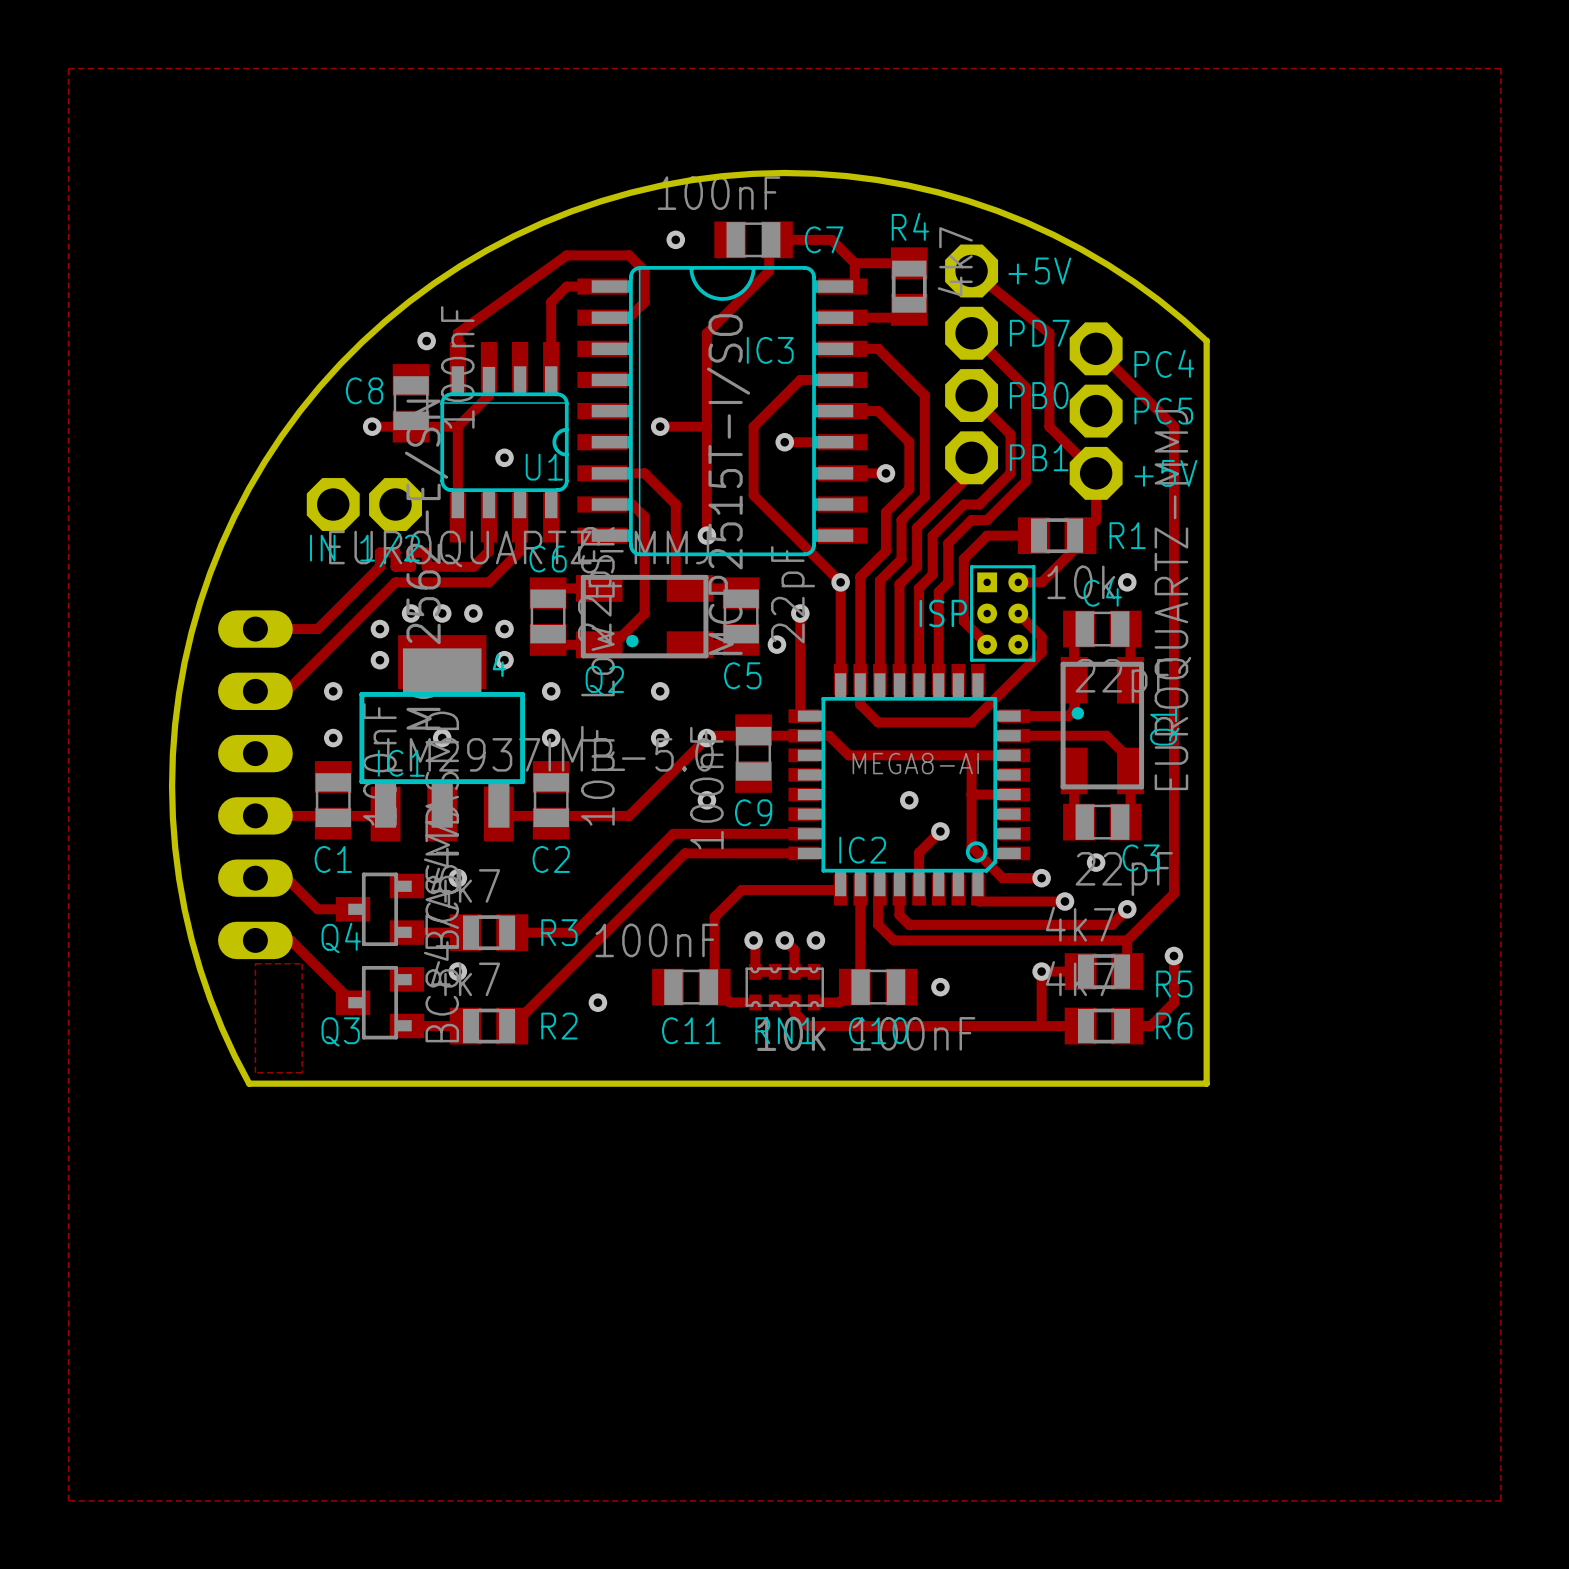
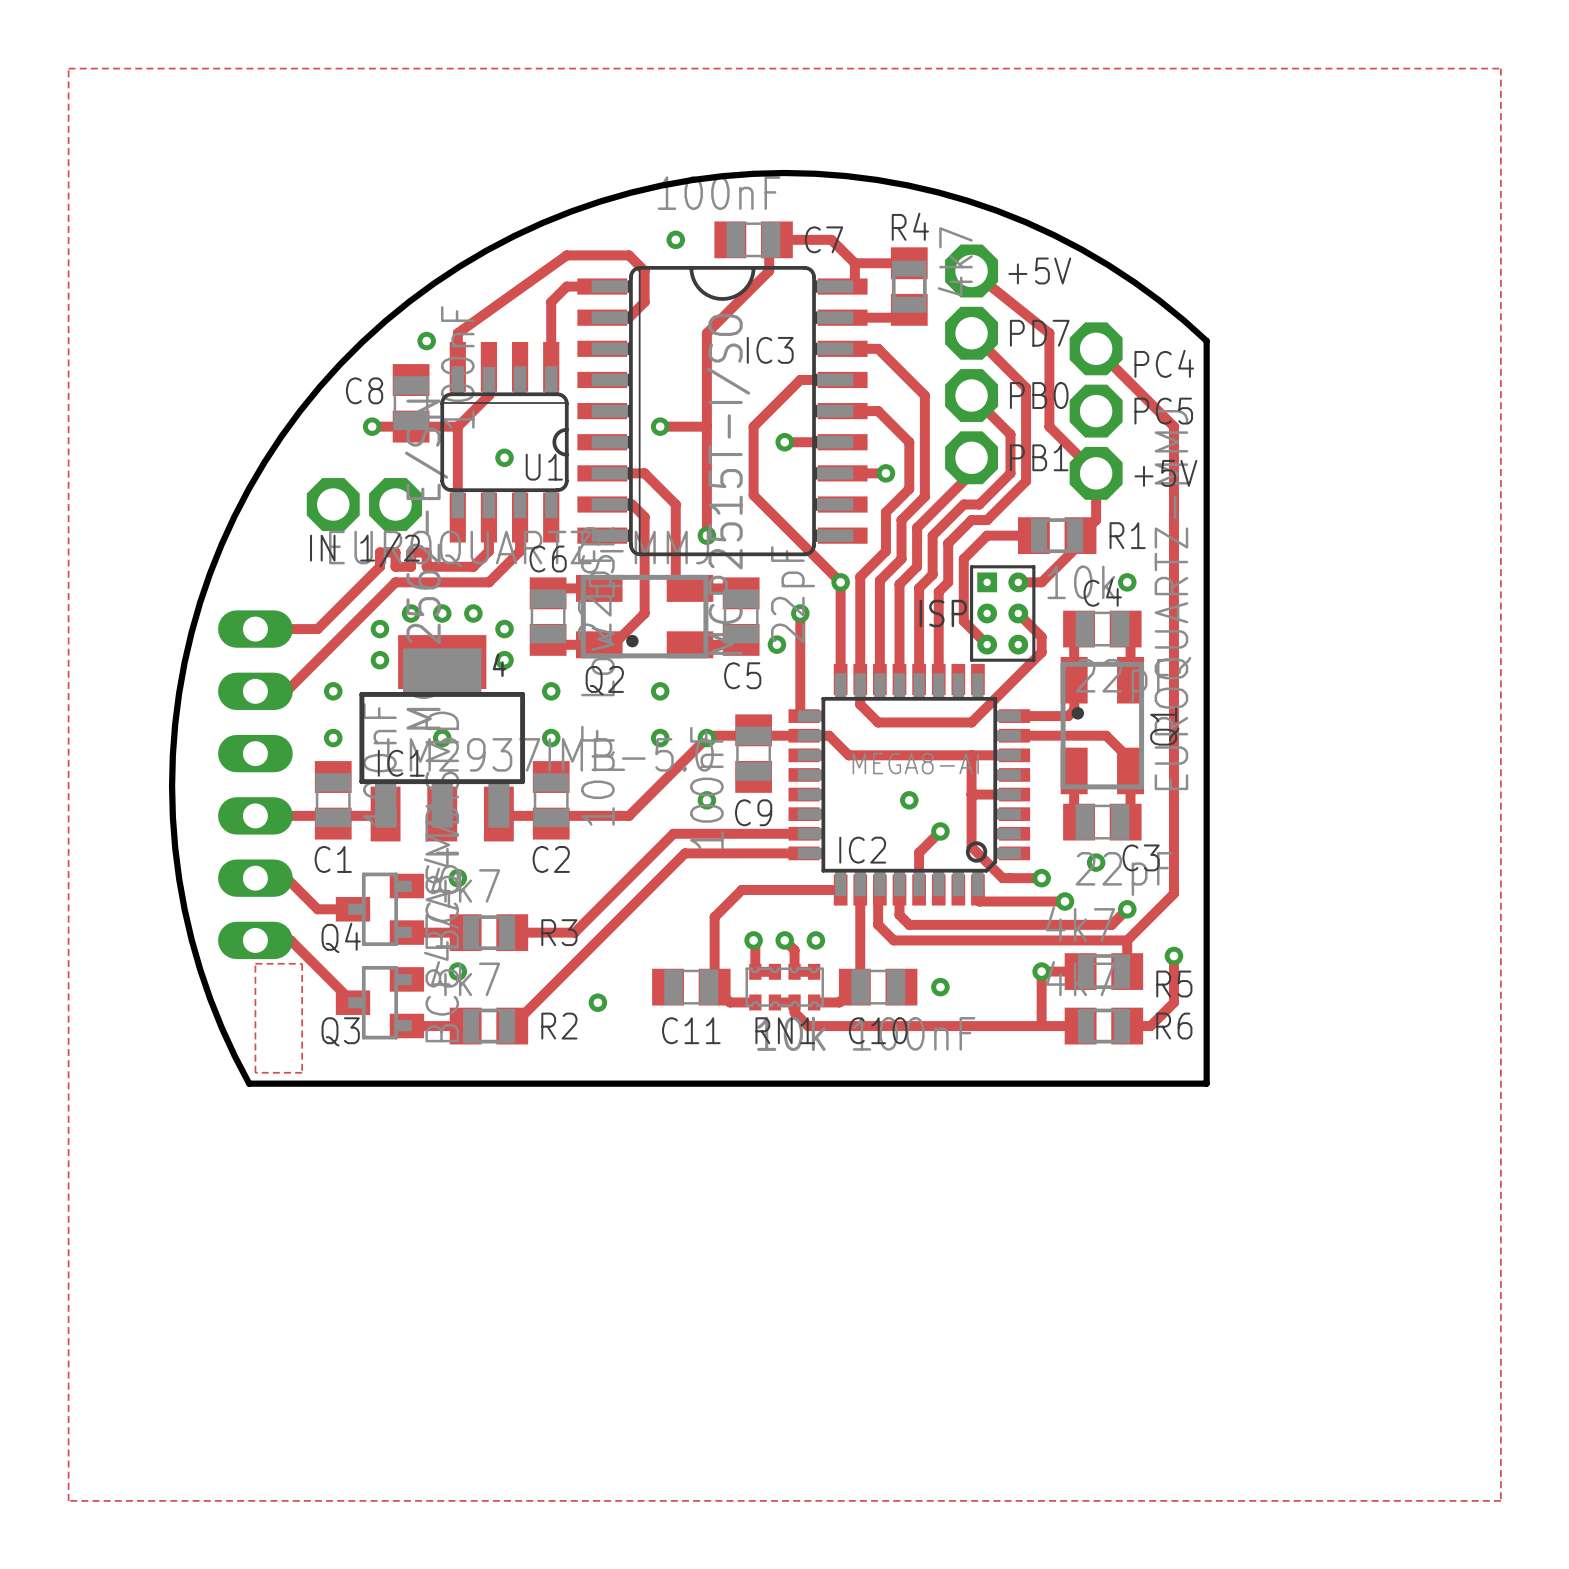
C11 value: 100nF (656, 940) -> none

